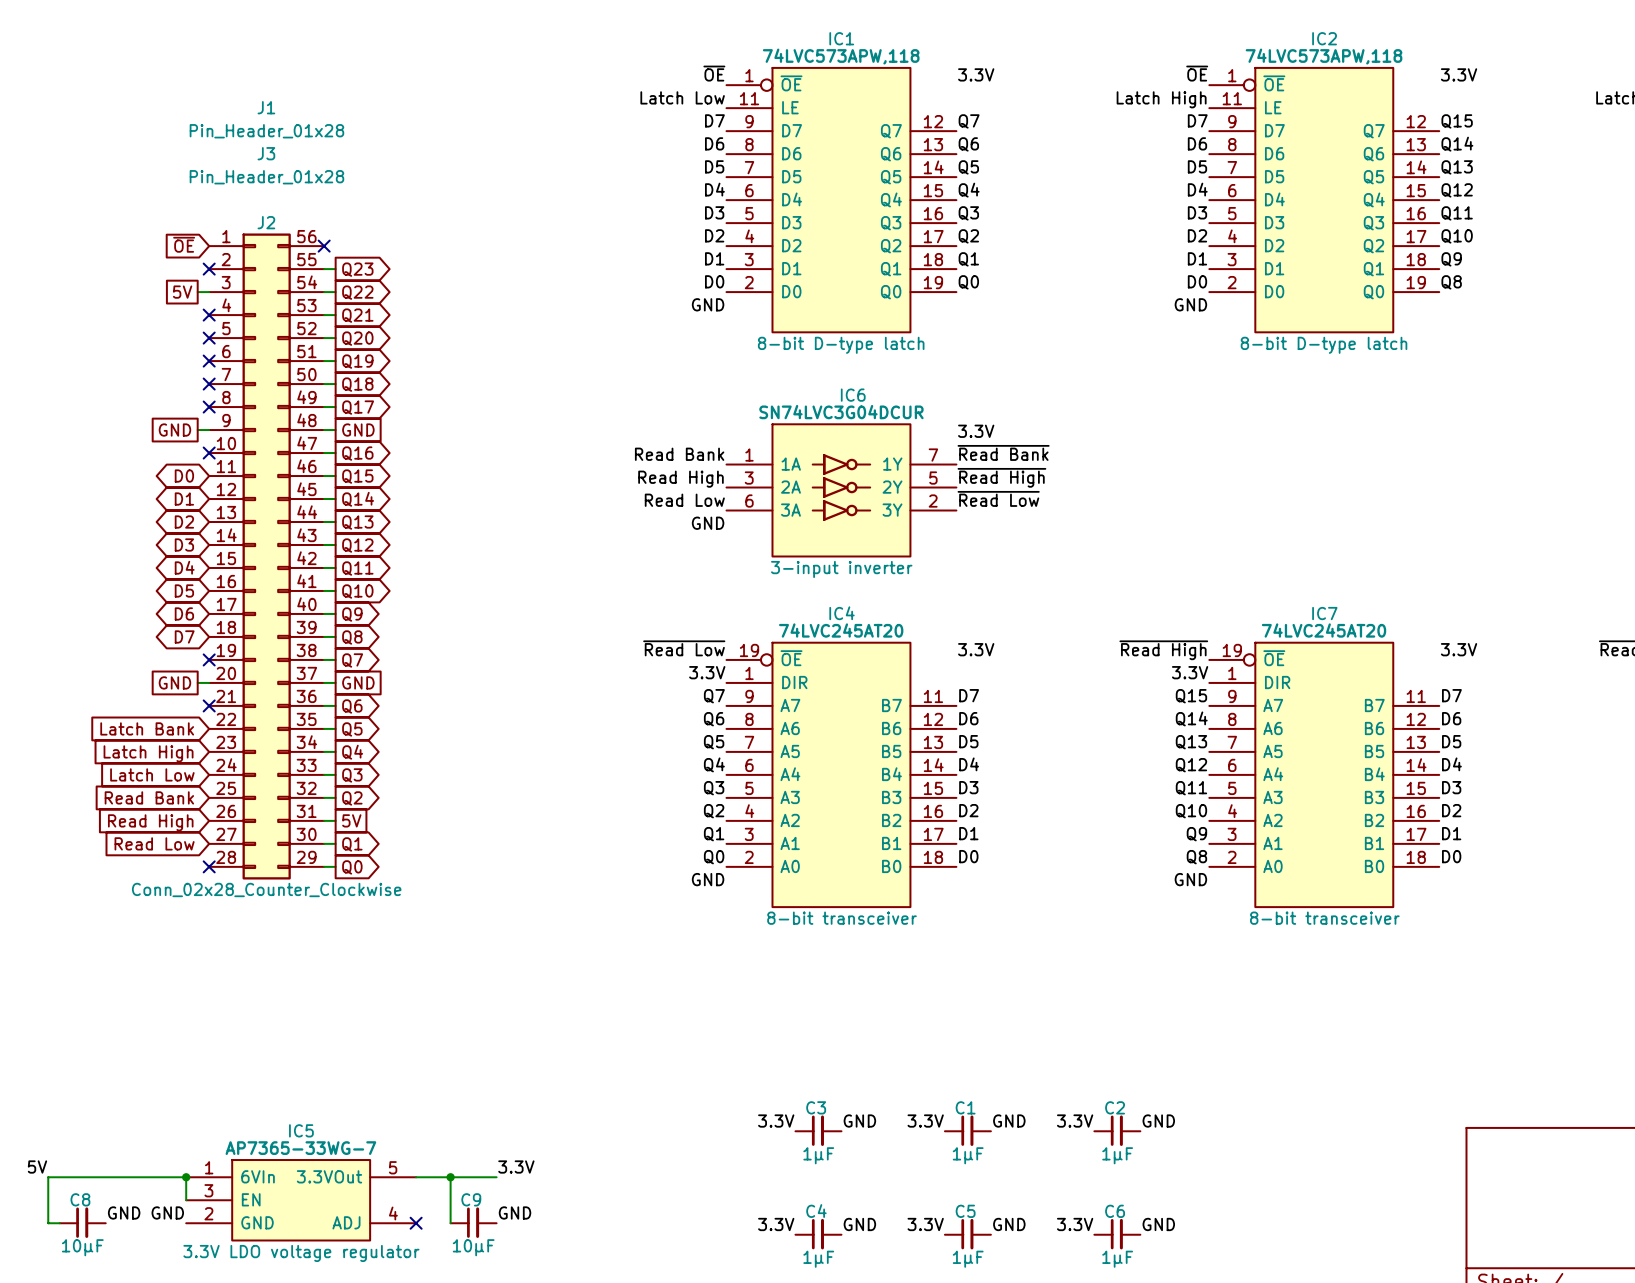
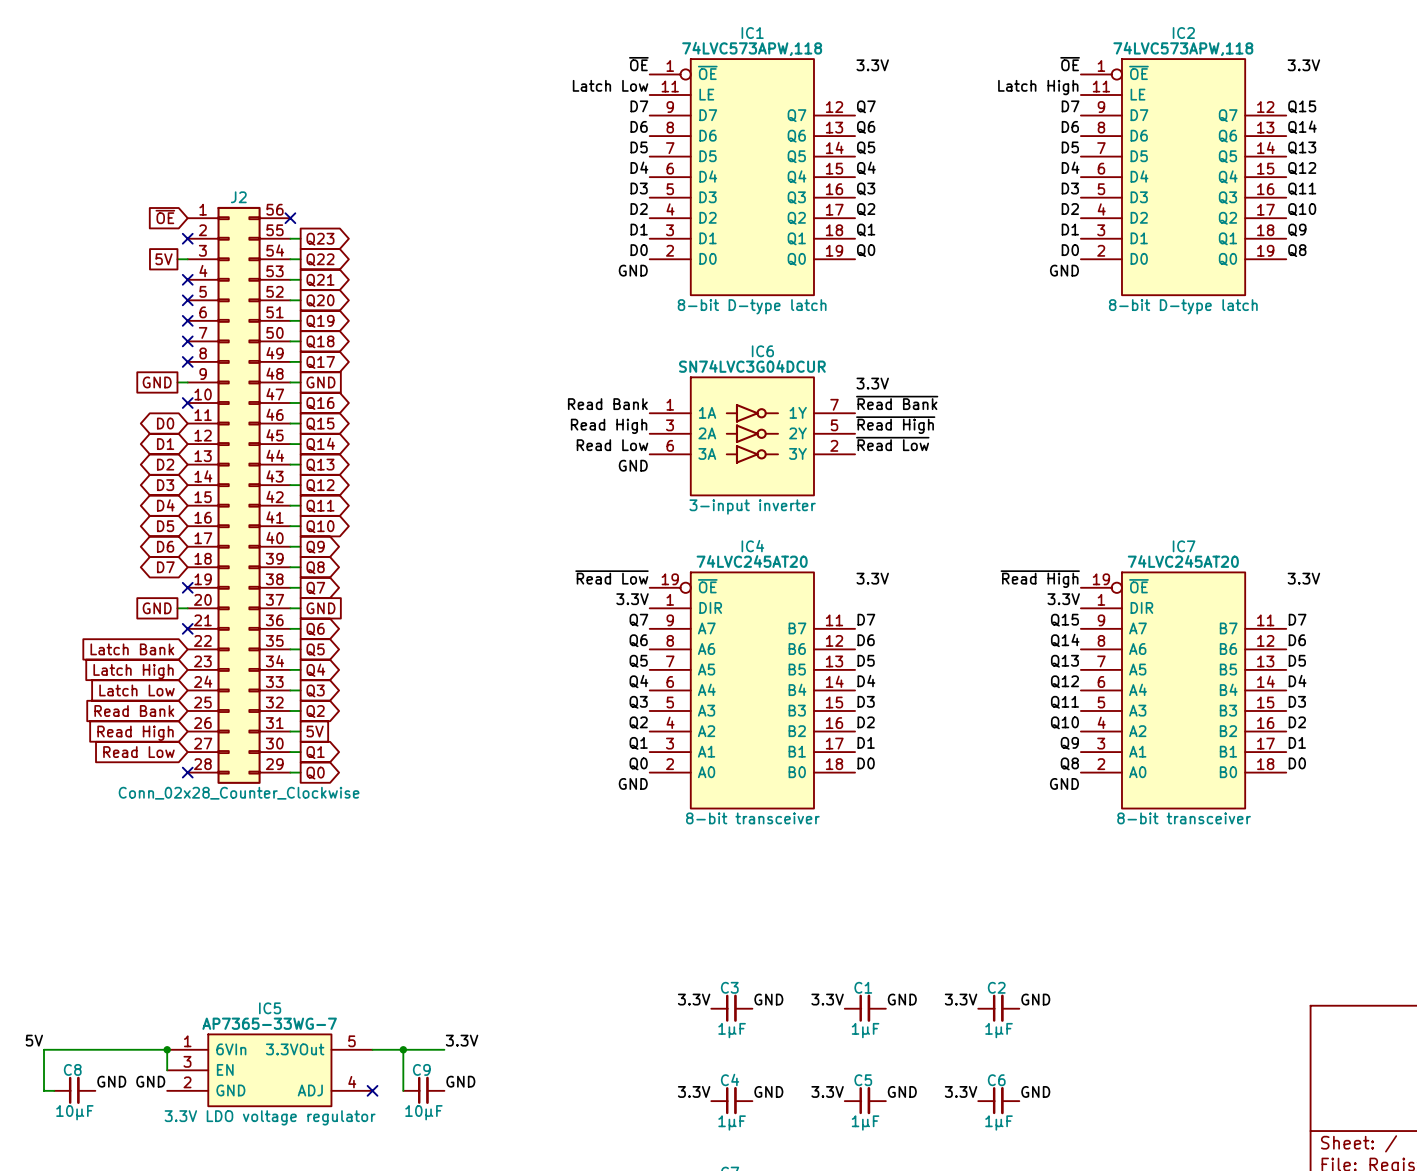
J1: Pin_Header_01x28 (266, 119) -> none
J3: Pin_Header_01x28 (266, 165) -> none

